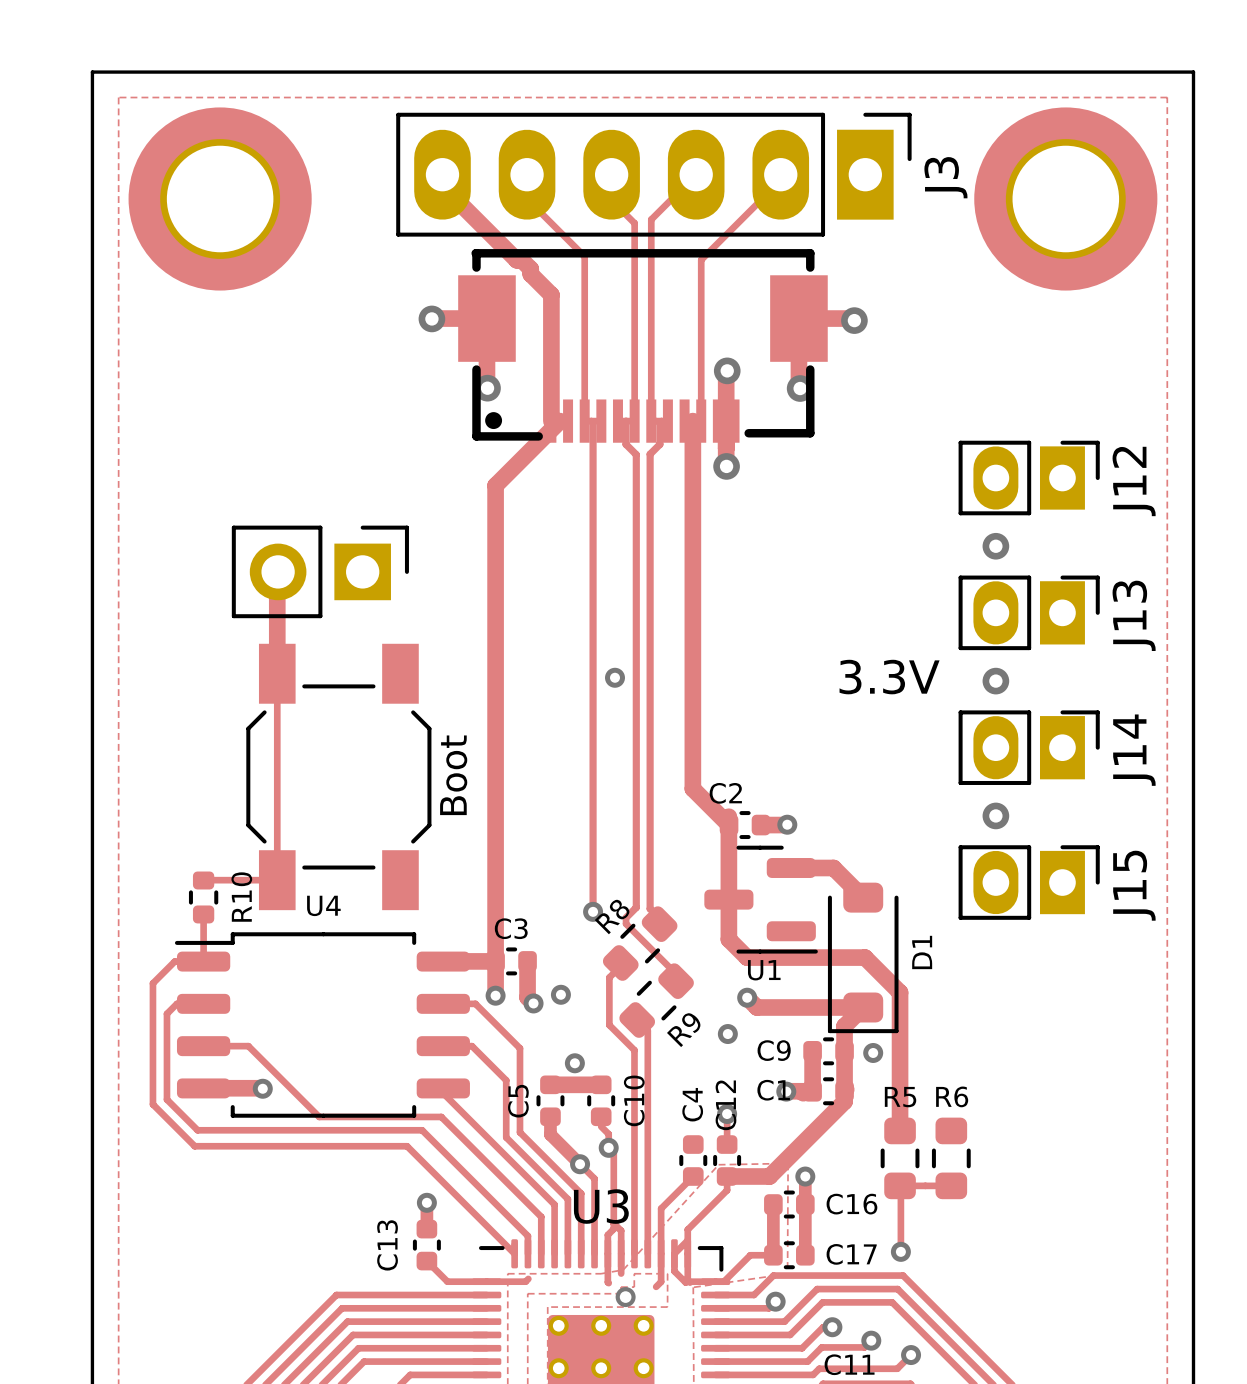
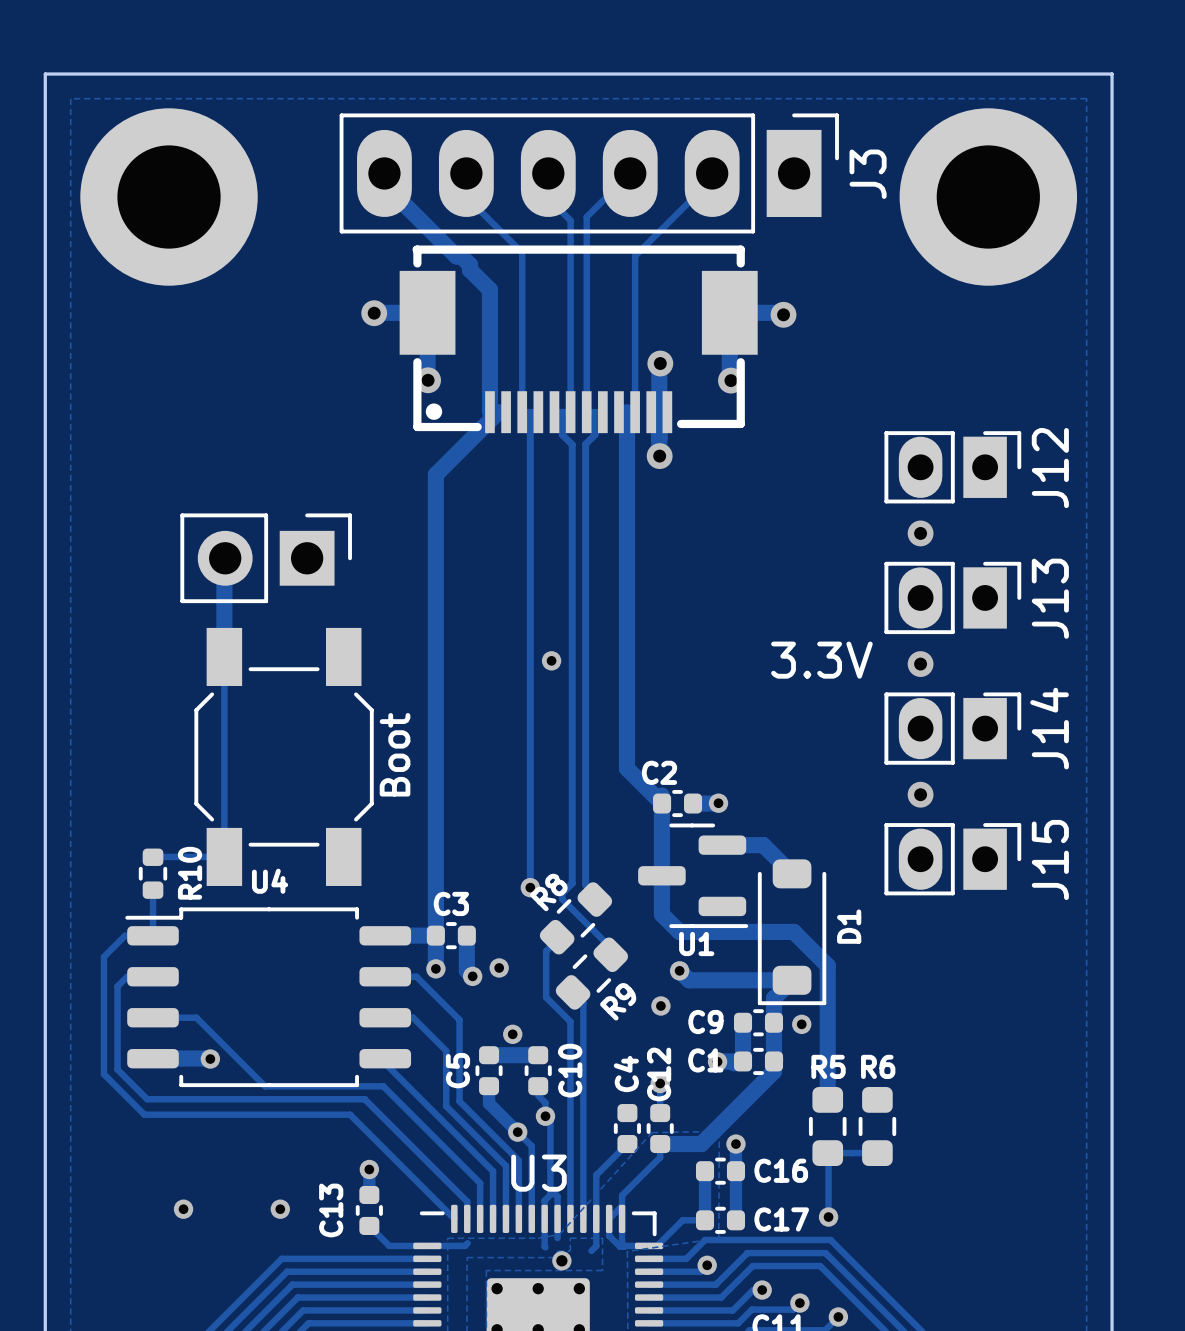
via: none -> (183, 1209)
via: none -> (280, 1209)

